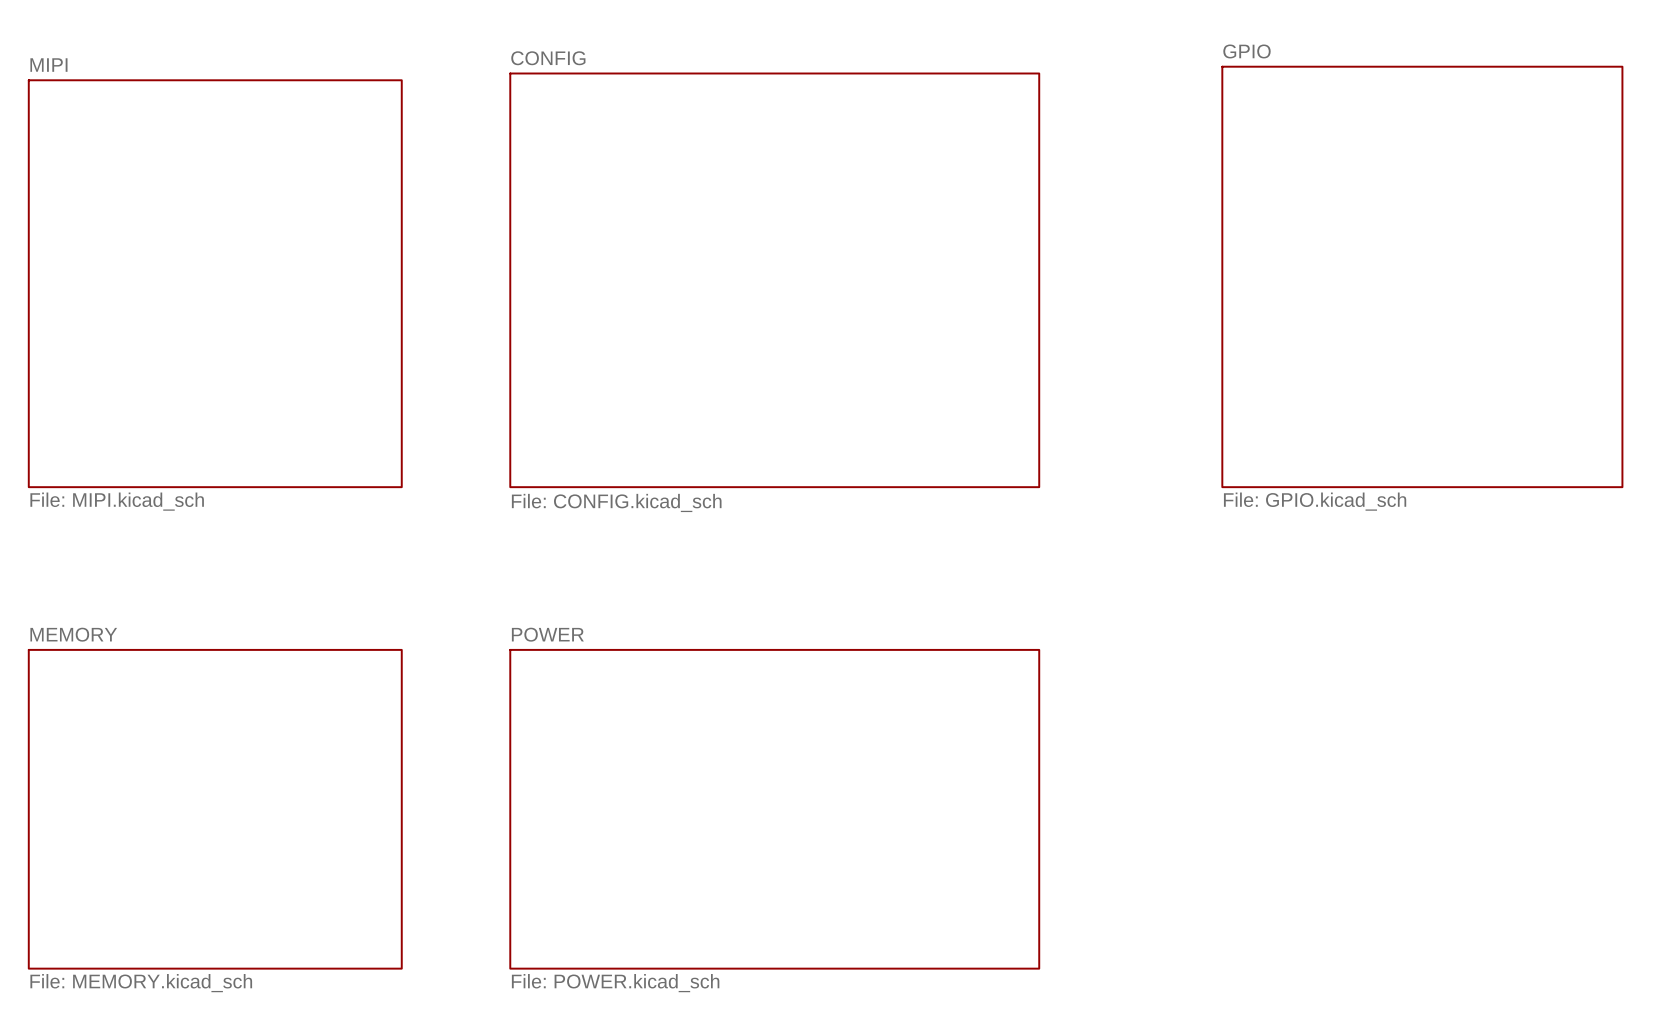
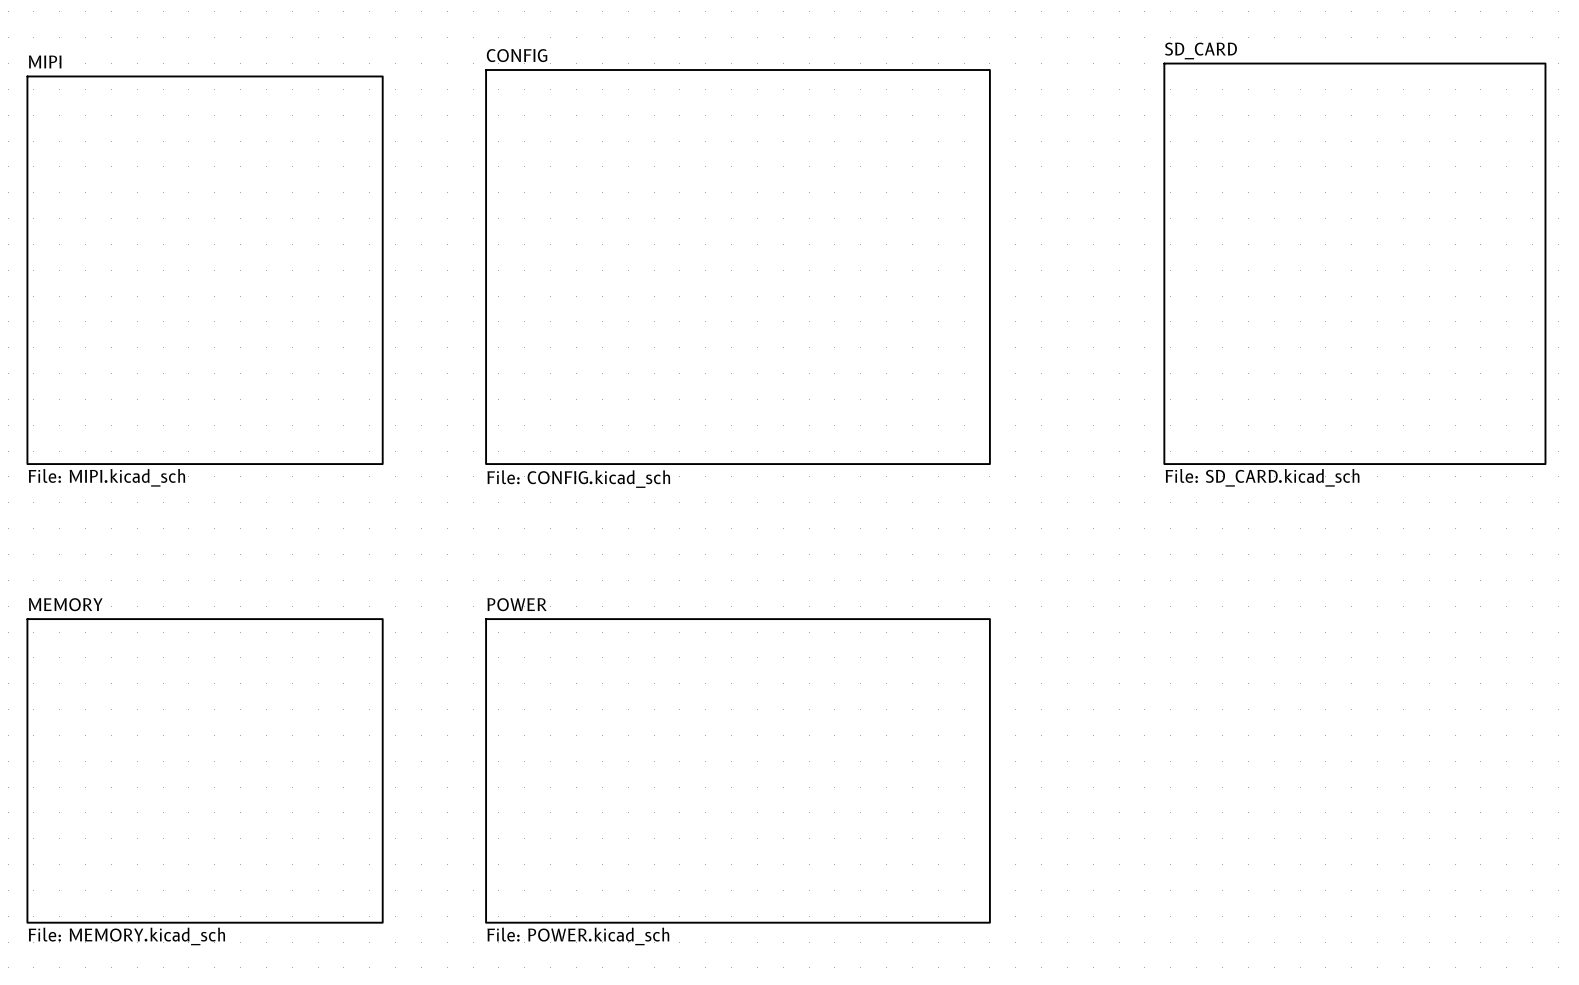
sheet GPIO name: GPIO (1246, 51) -> SD_CARD (1200, 50)
sheet GPIO value: File: GPIO.kicad_sch (1315, 501) -> File: SD_CARD.kicad_sch (1262, 477)

